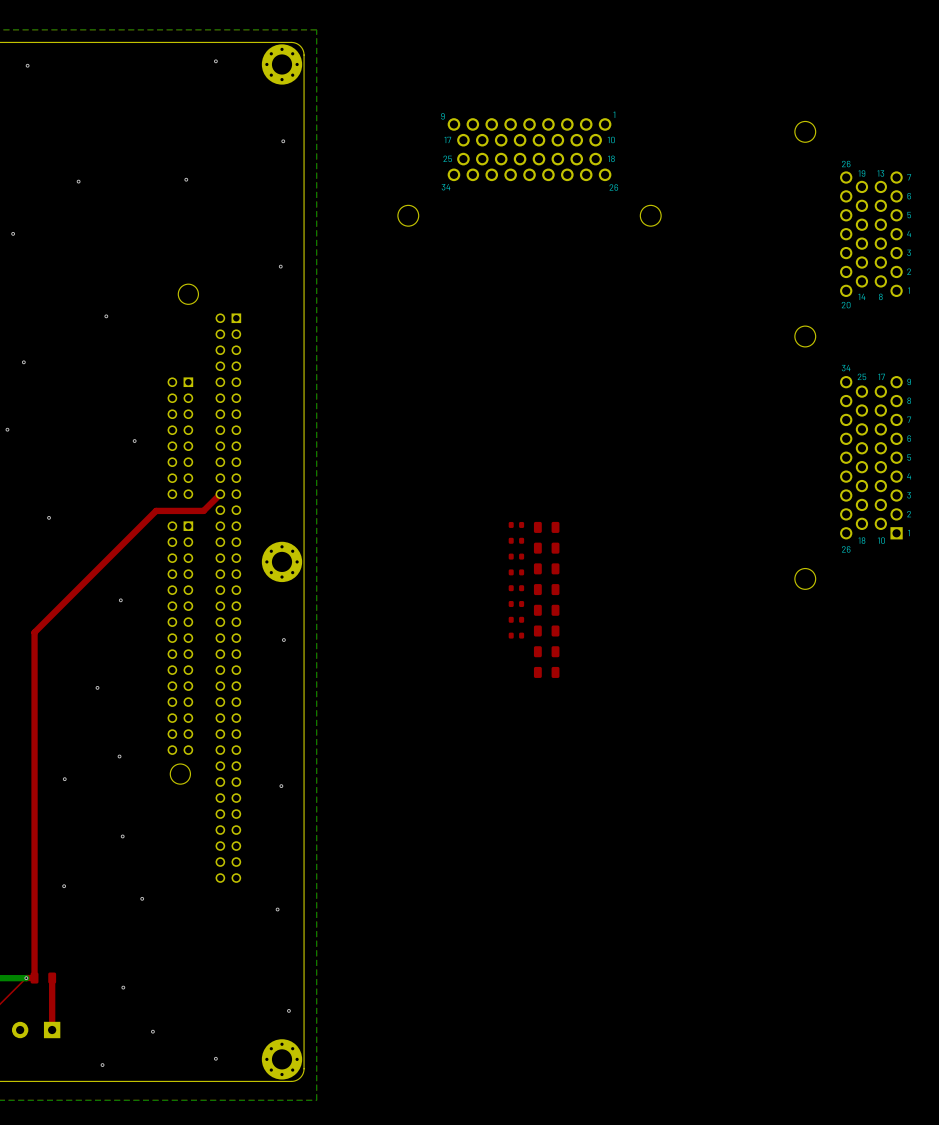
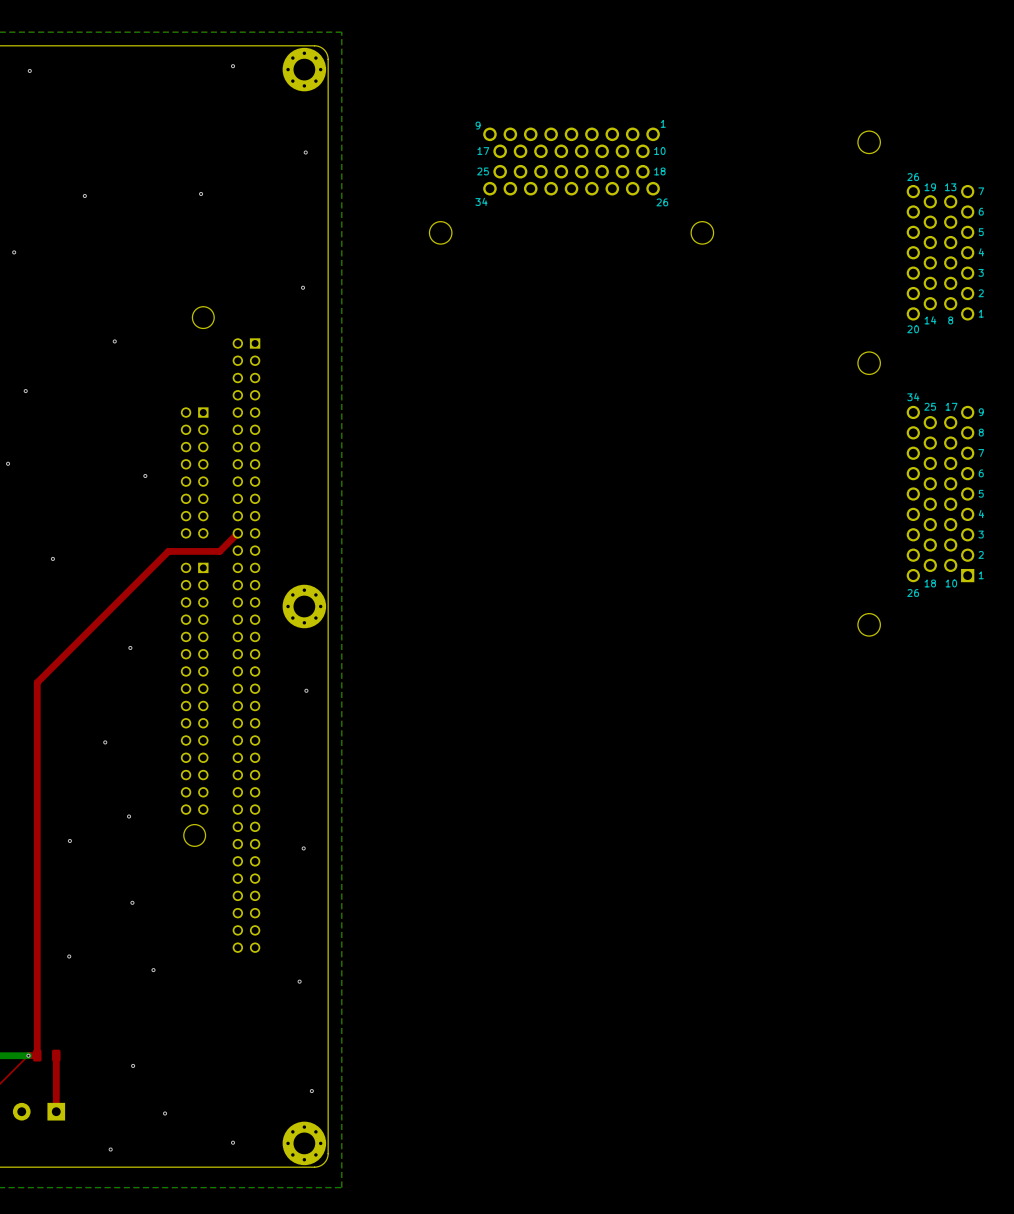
part: (516, 524) -> none
part: (546, 527) -> none
part: (516, 540) -> none
part: (546, 548) -> none
part: (516, 556) -> none
part: (546, 568) -> none
part: (516, 572) -> none
part: (516, 588) -> none
part: (546, 589) -> none
part: (516, 603) -> none
part: (546, 610) -> none
part: (516, 619) -> none
part: (546, 631) -> none
part: (516, 635) -> none
part: (546, 651) -> none
part: (546, 672) -> none

